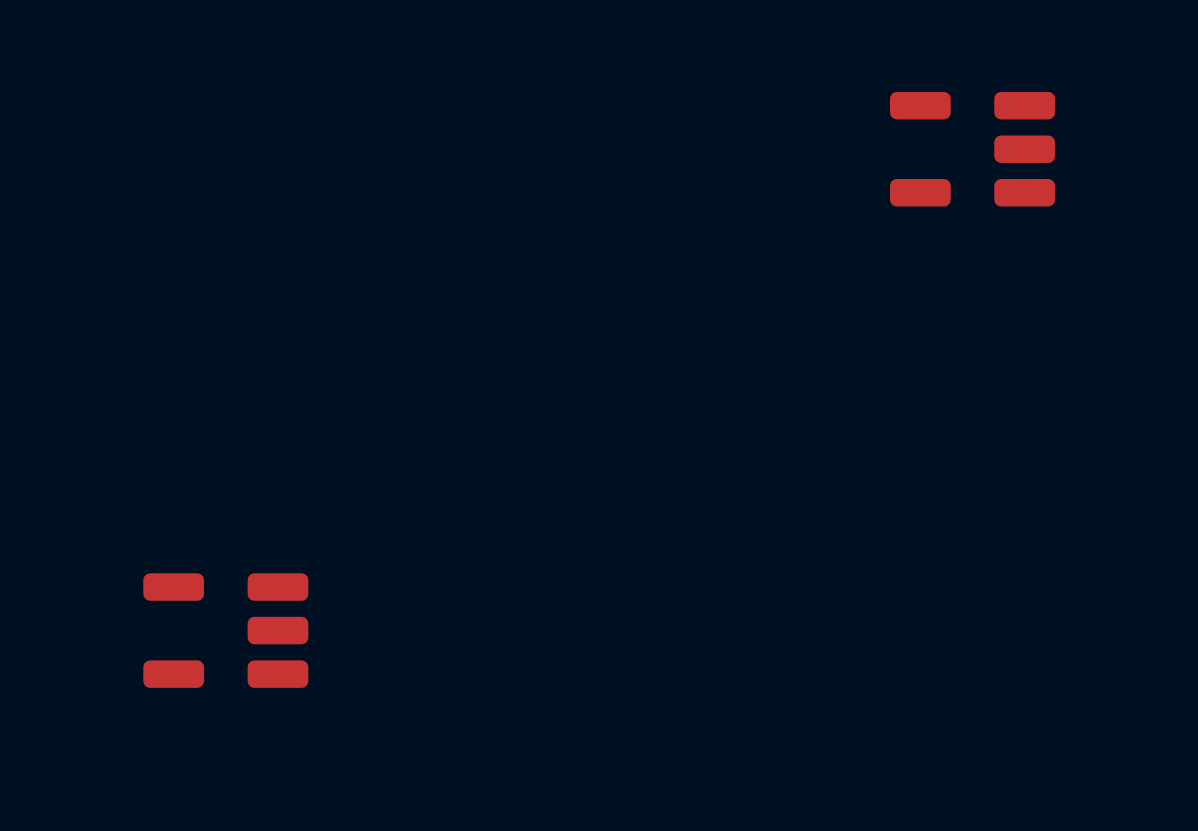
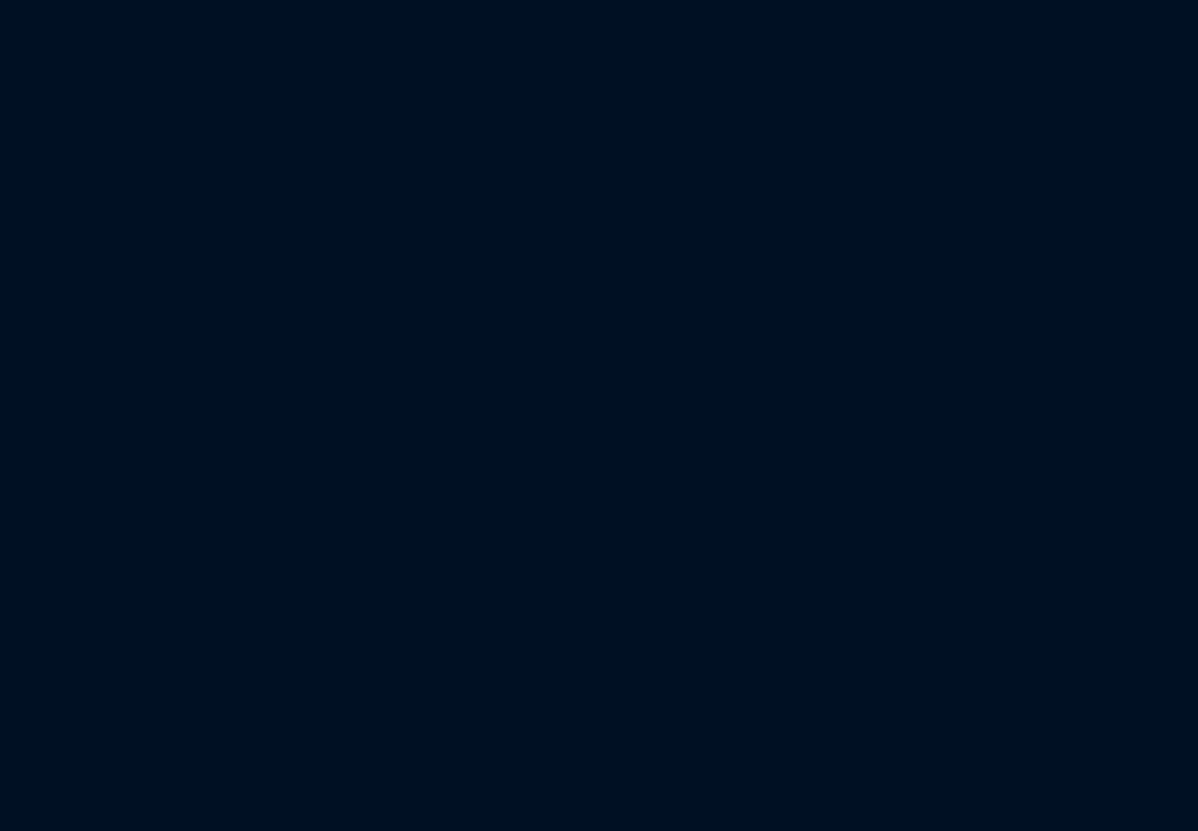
part: (972, 149) -> none
part: (225, 630) -> none

